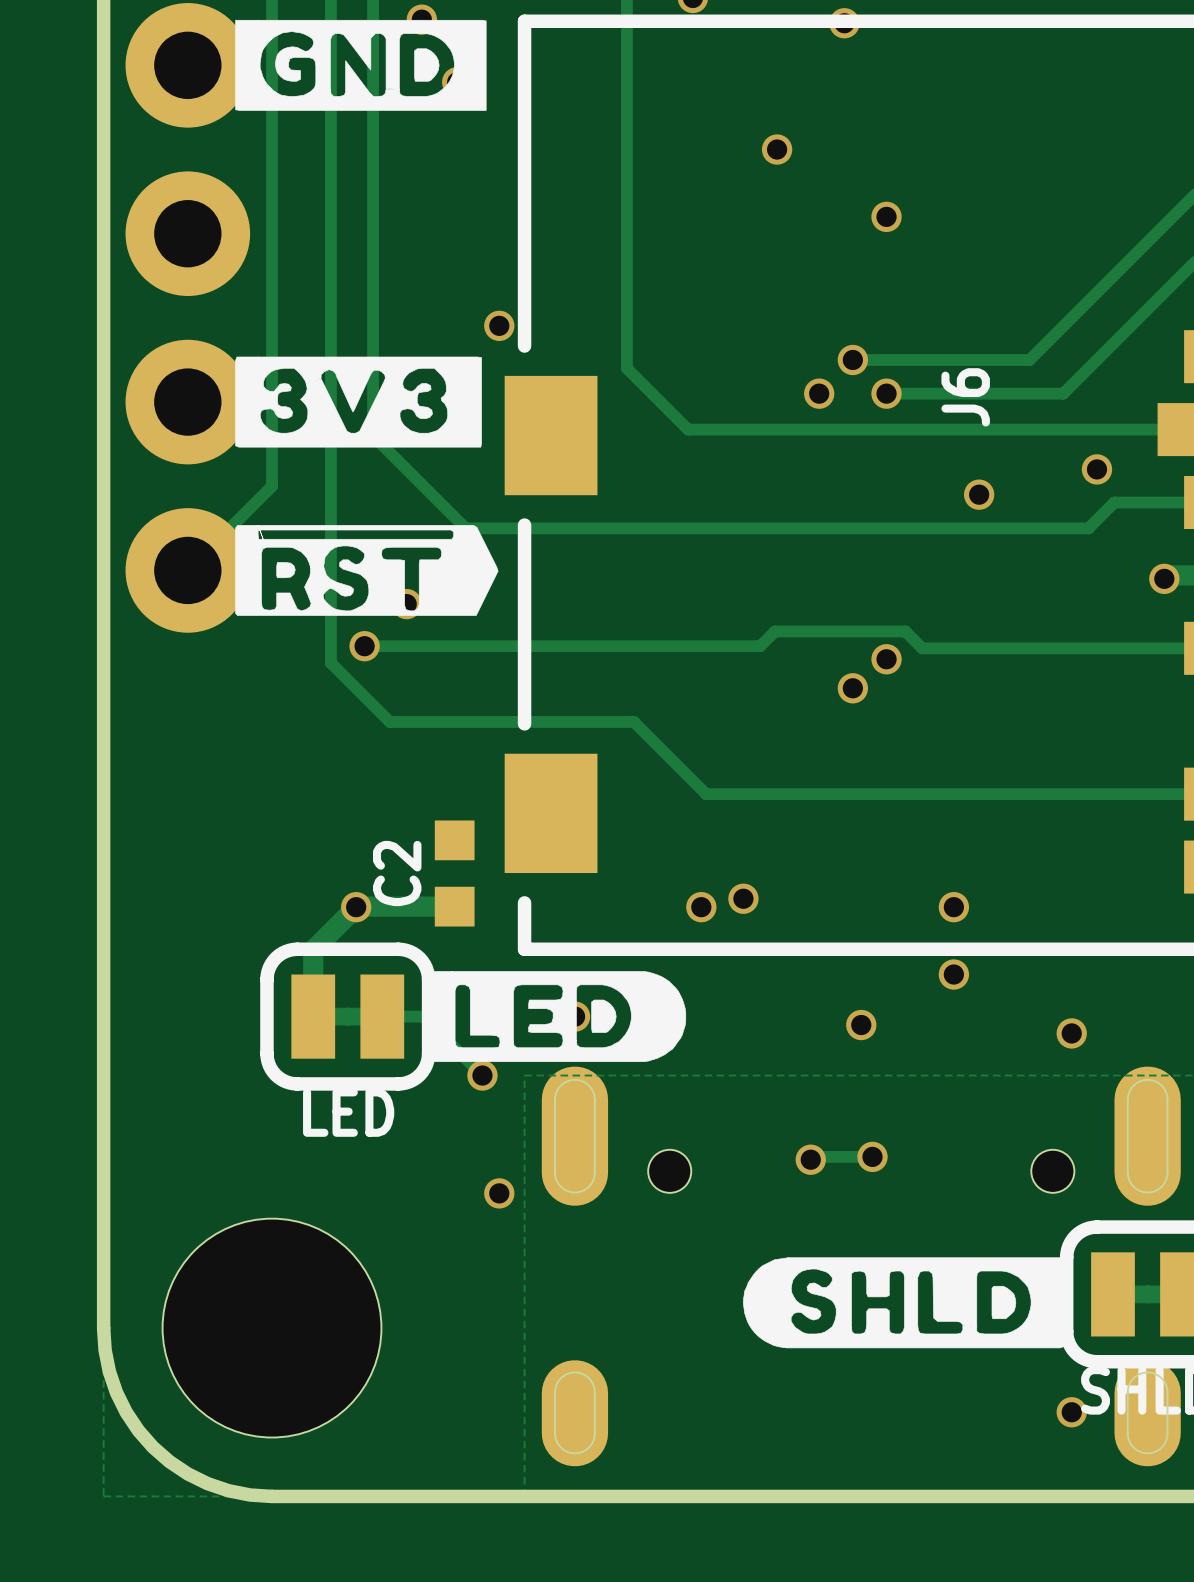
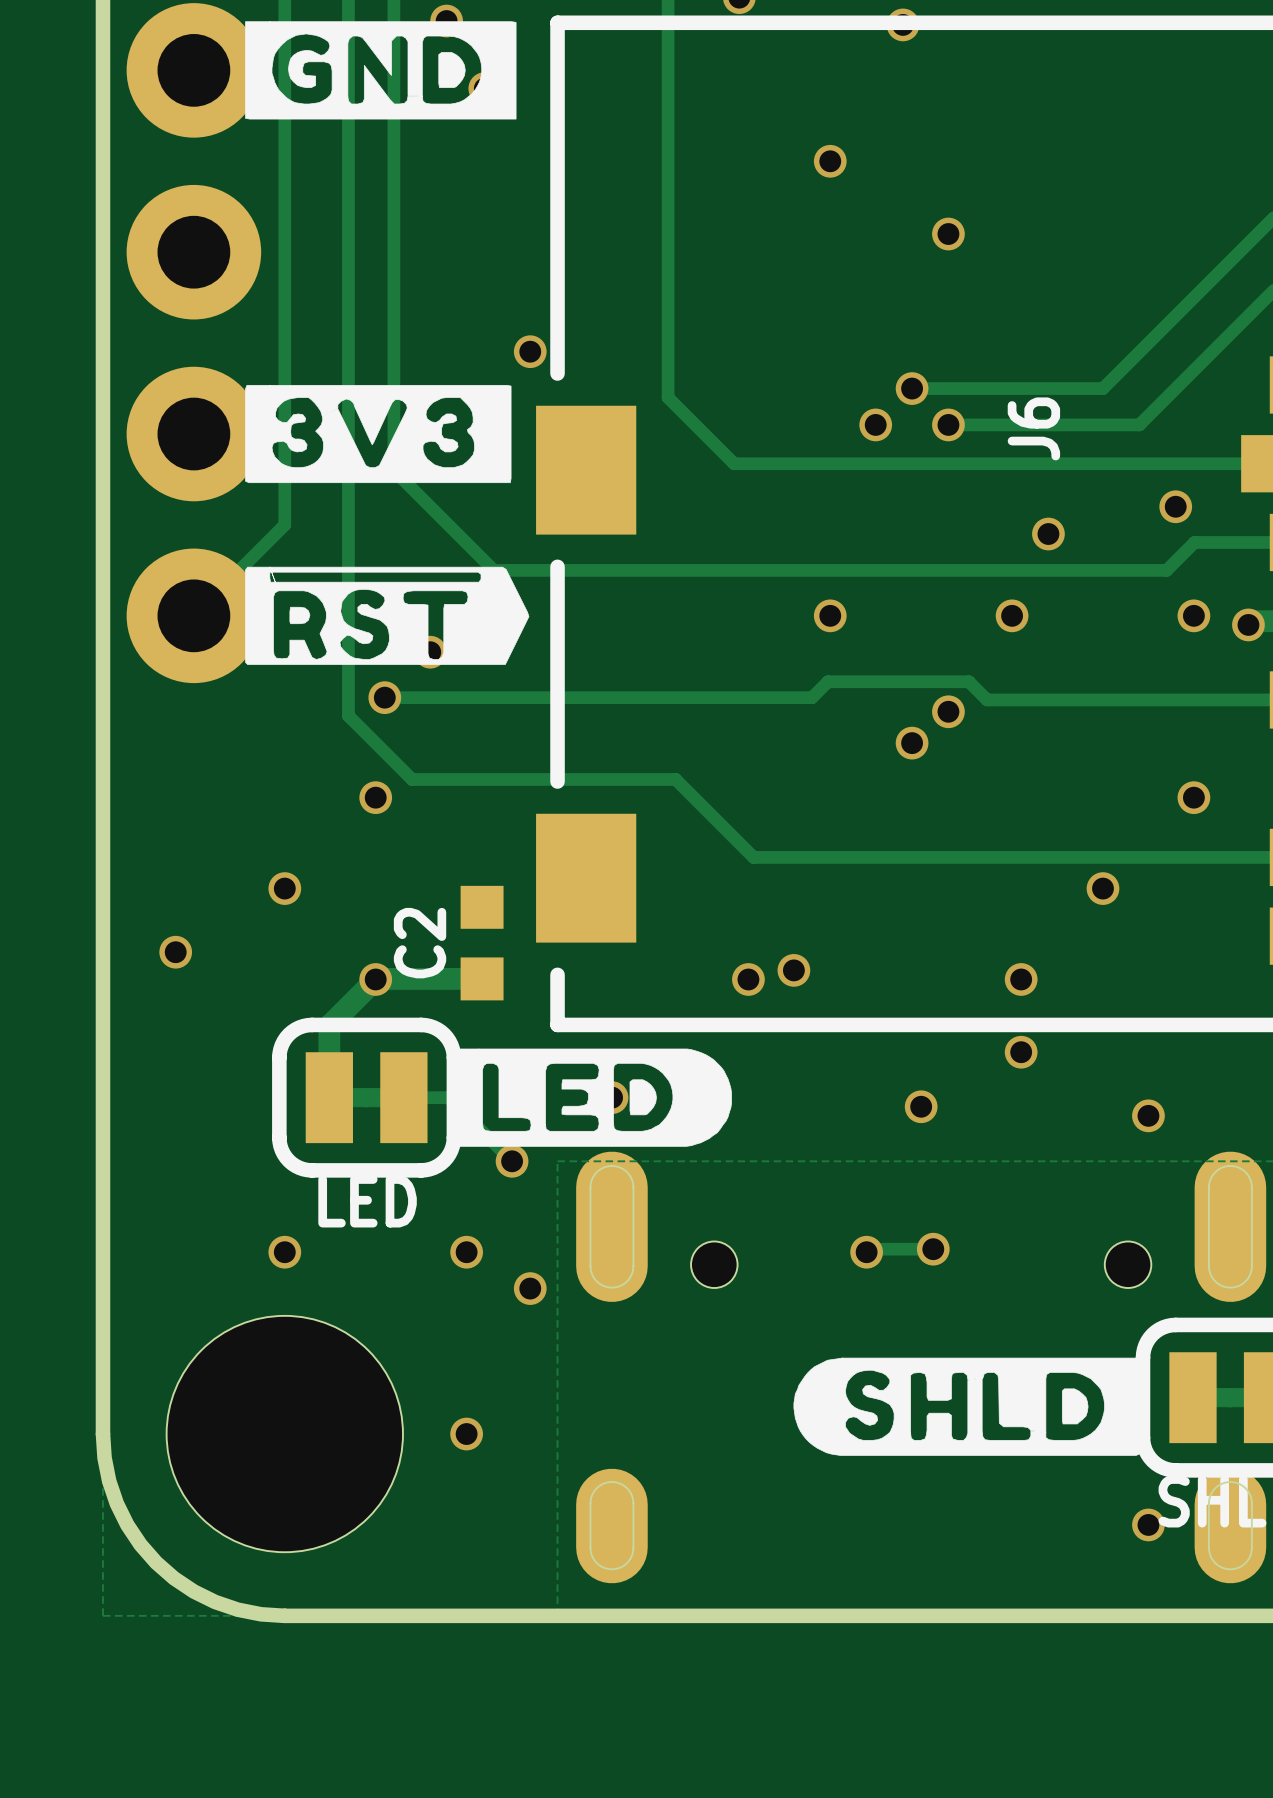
via: none -> (830, 615)
via: none -> (1012, 615)
via: none -> (1193, 615)
via: none -> (375, 797)
via: none -> (1193, 797)
via: none -> (284, 888)
via: none -> (1102, 888)
via: none -> (175, 952)
via: none -> (284, 1252)
via: none -> (466, 1252)
via: none -> (466, 1434)

